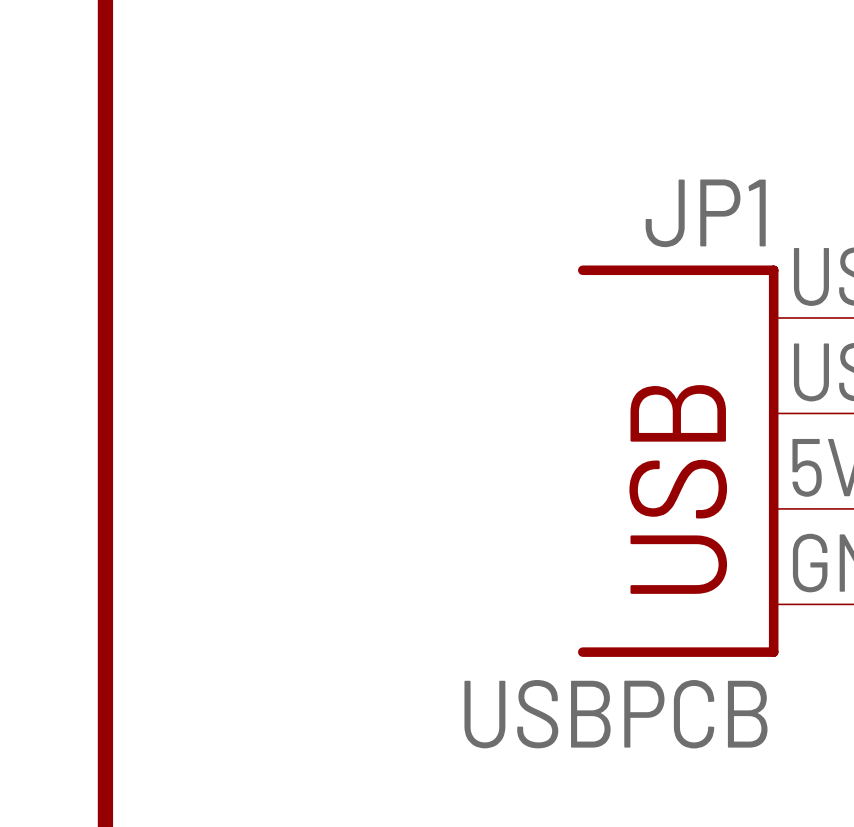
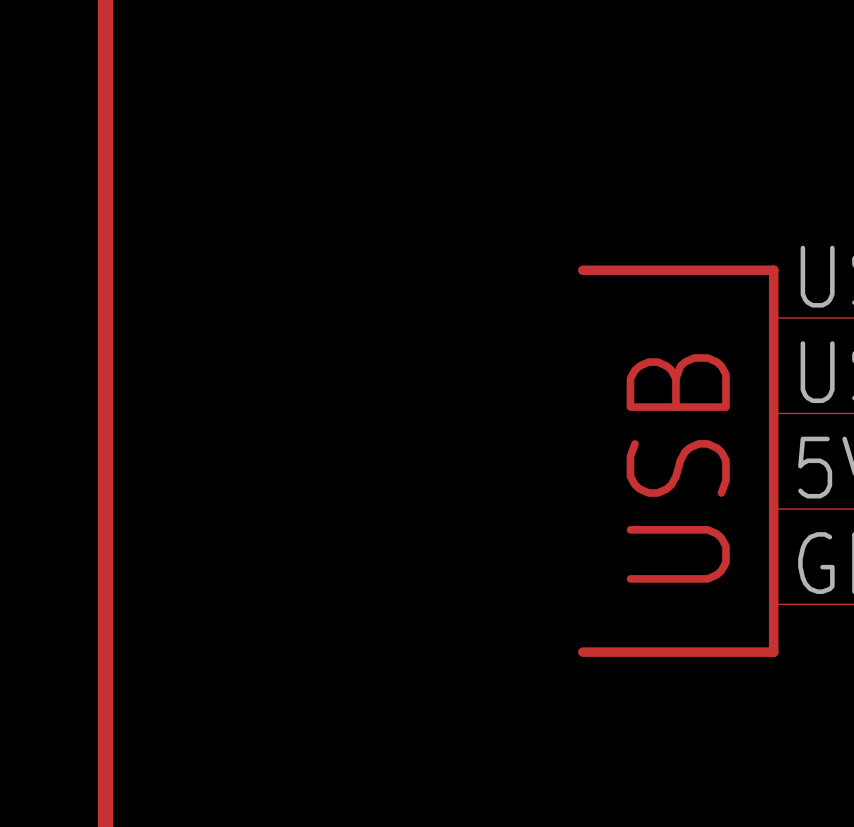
JP1 name: JP1 (705, 213) -> none
JP1 value: USBPCB (615, 714) -> none

